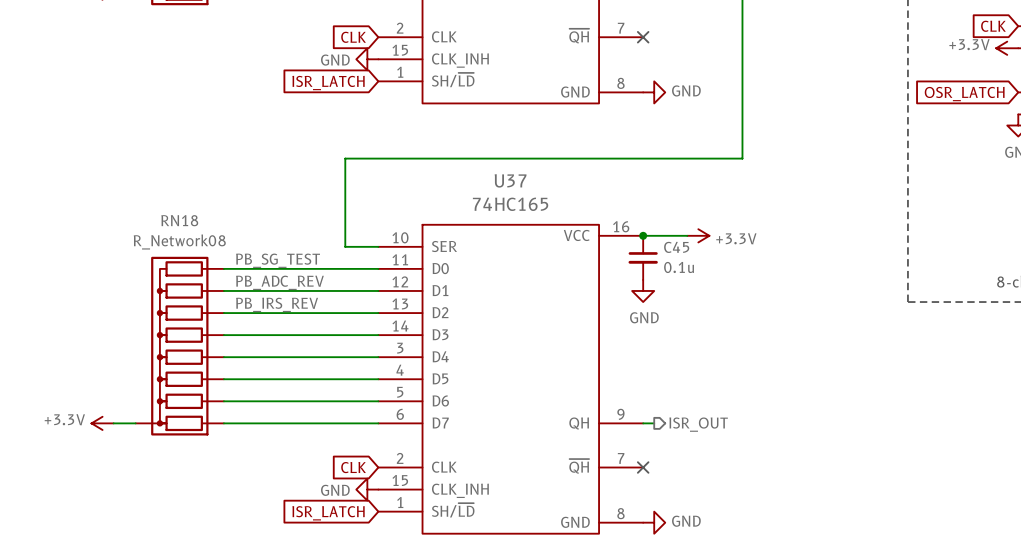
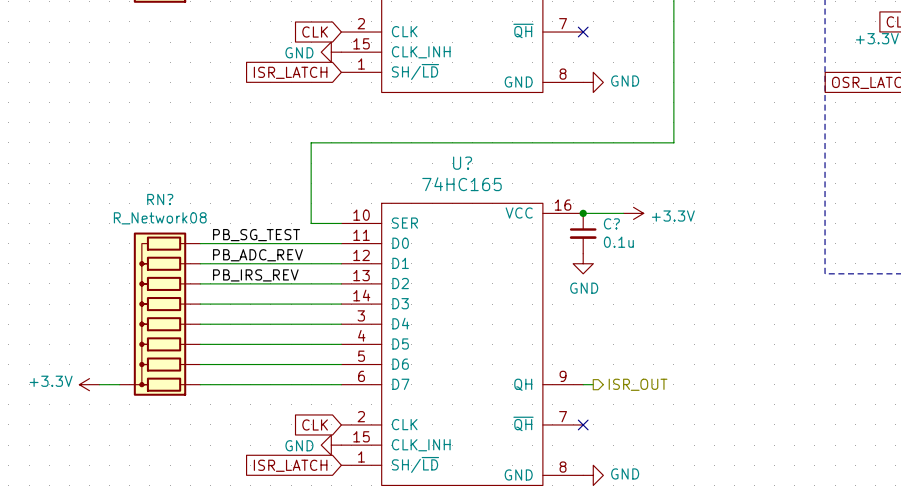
U37 name: U37 (510, 180) -> U? (462, 163)
RN18 name: RN18 (179, 220) -> RN? (160, 199)
C45 name: C45 (676, 247) -> C? (611, 223)

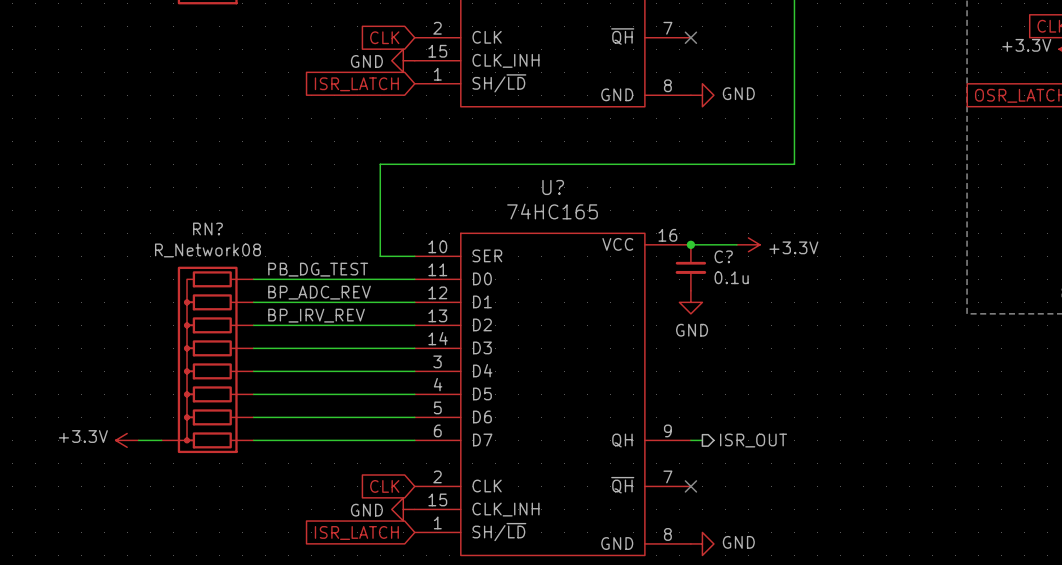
label: PB_SG_TEST (256, 235) -> PB_DG_TEST (318, 269)
label: PB_ADC_REV (257, 255) -> BP_ADC_REV (319, 292)
label: PB_IRS_REV (255, 275) -> BP_IRV_REV (316, 315)

